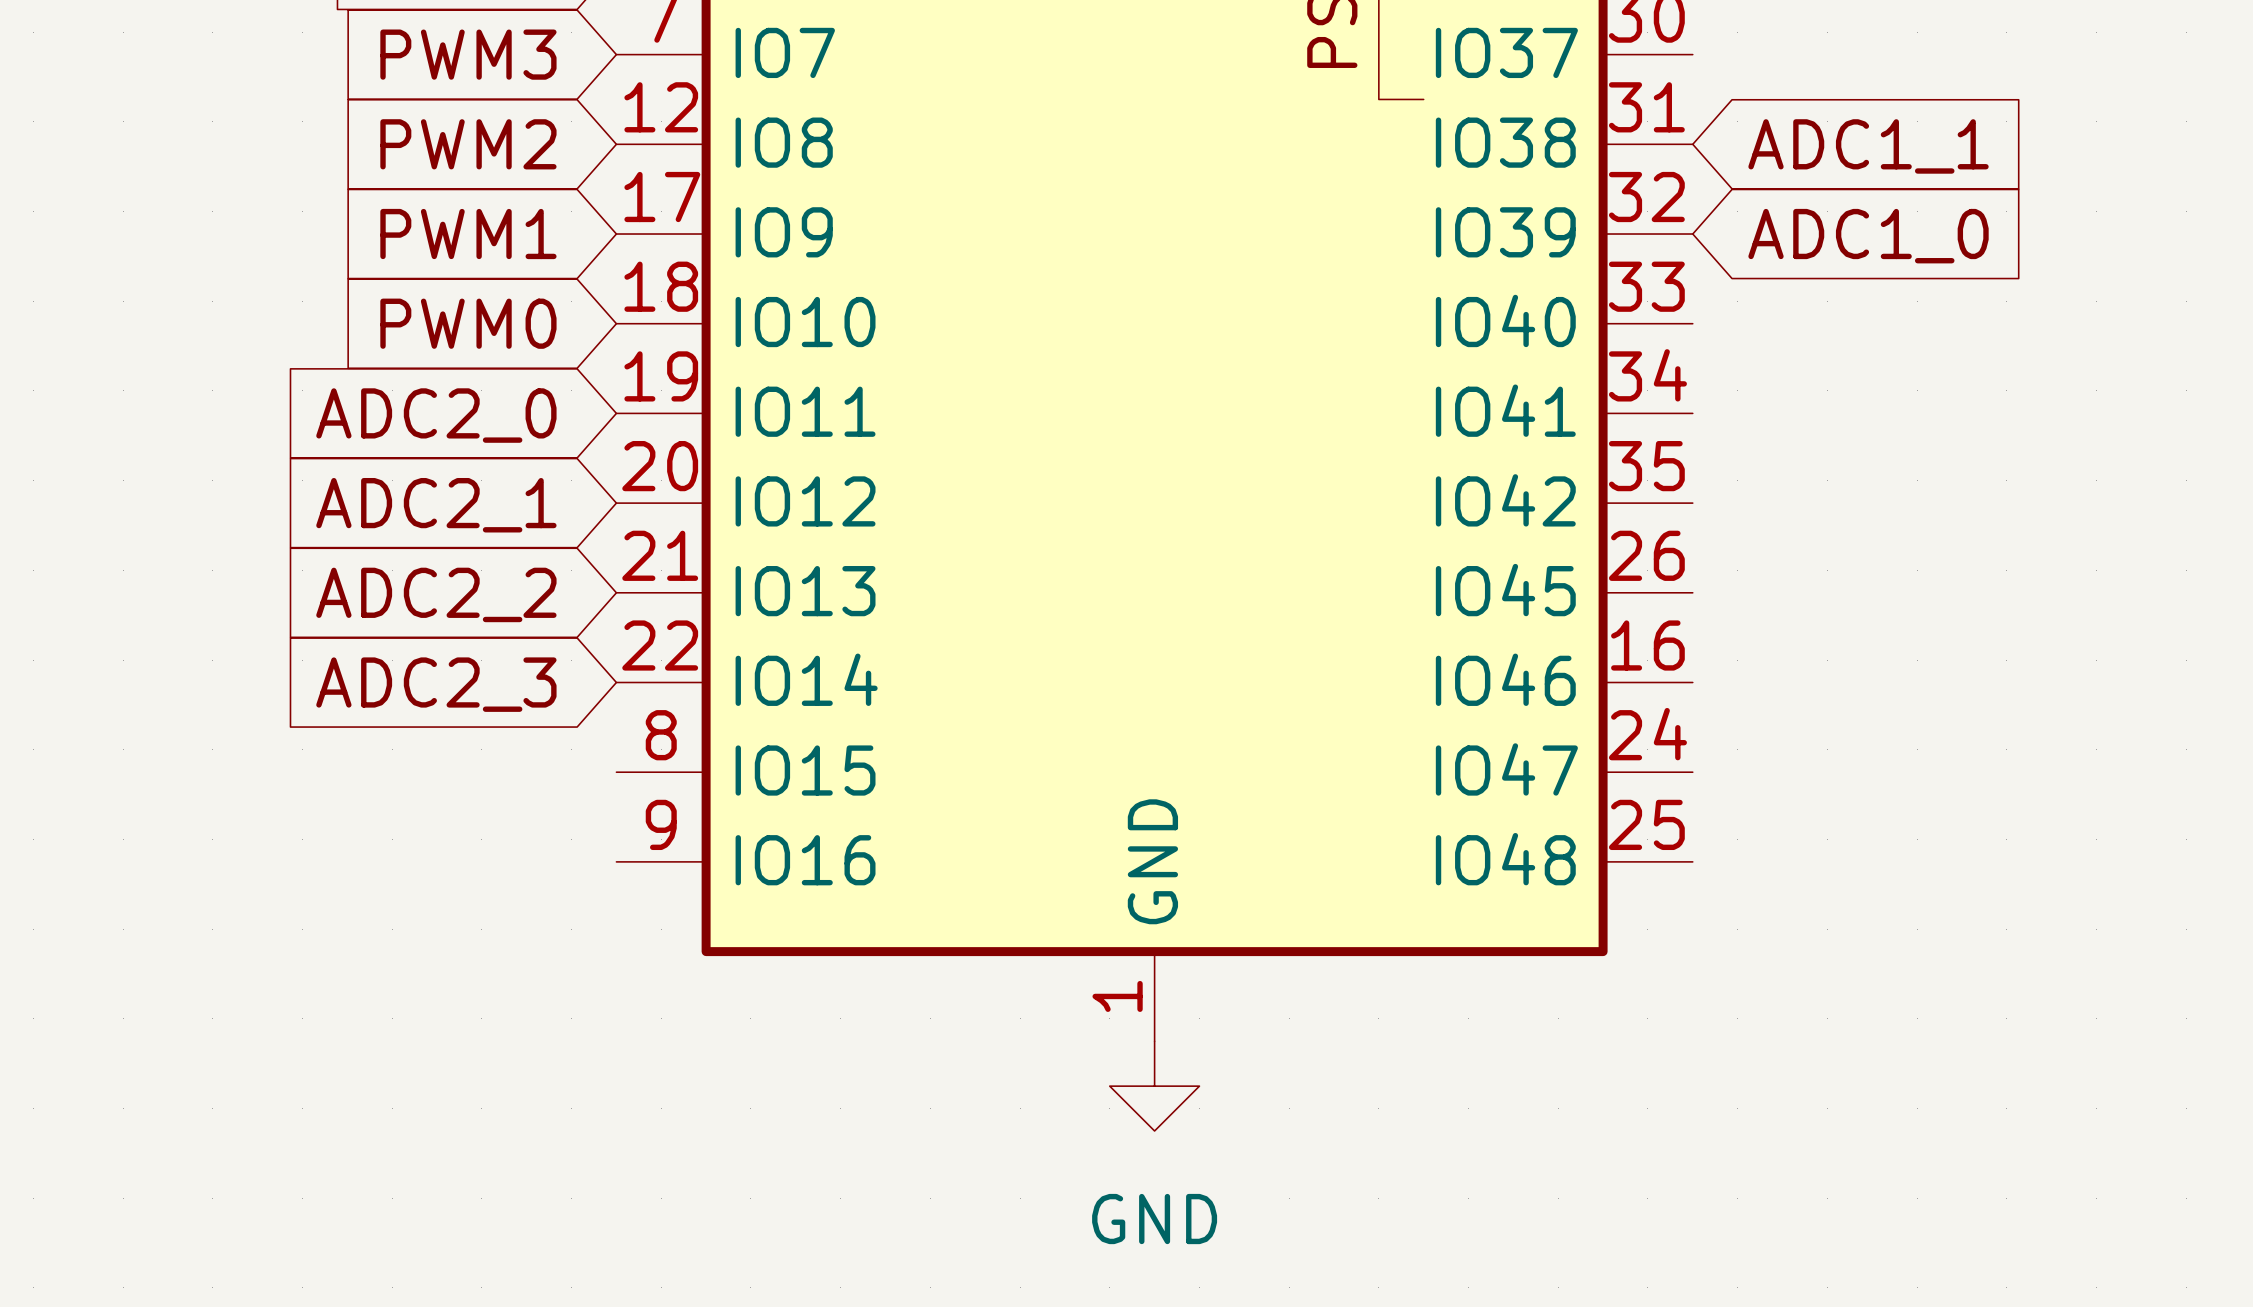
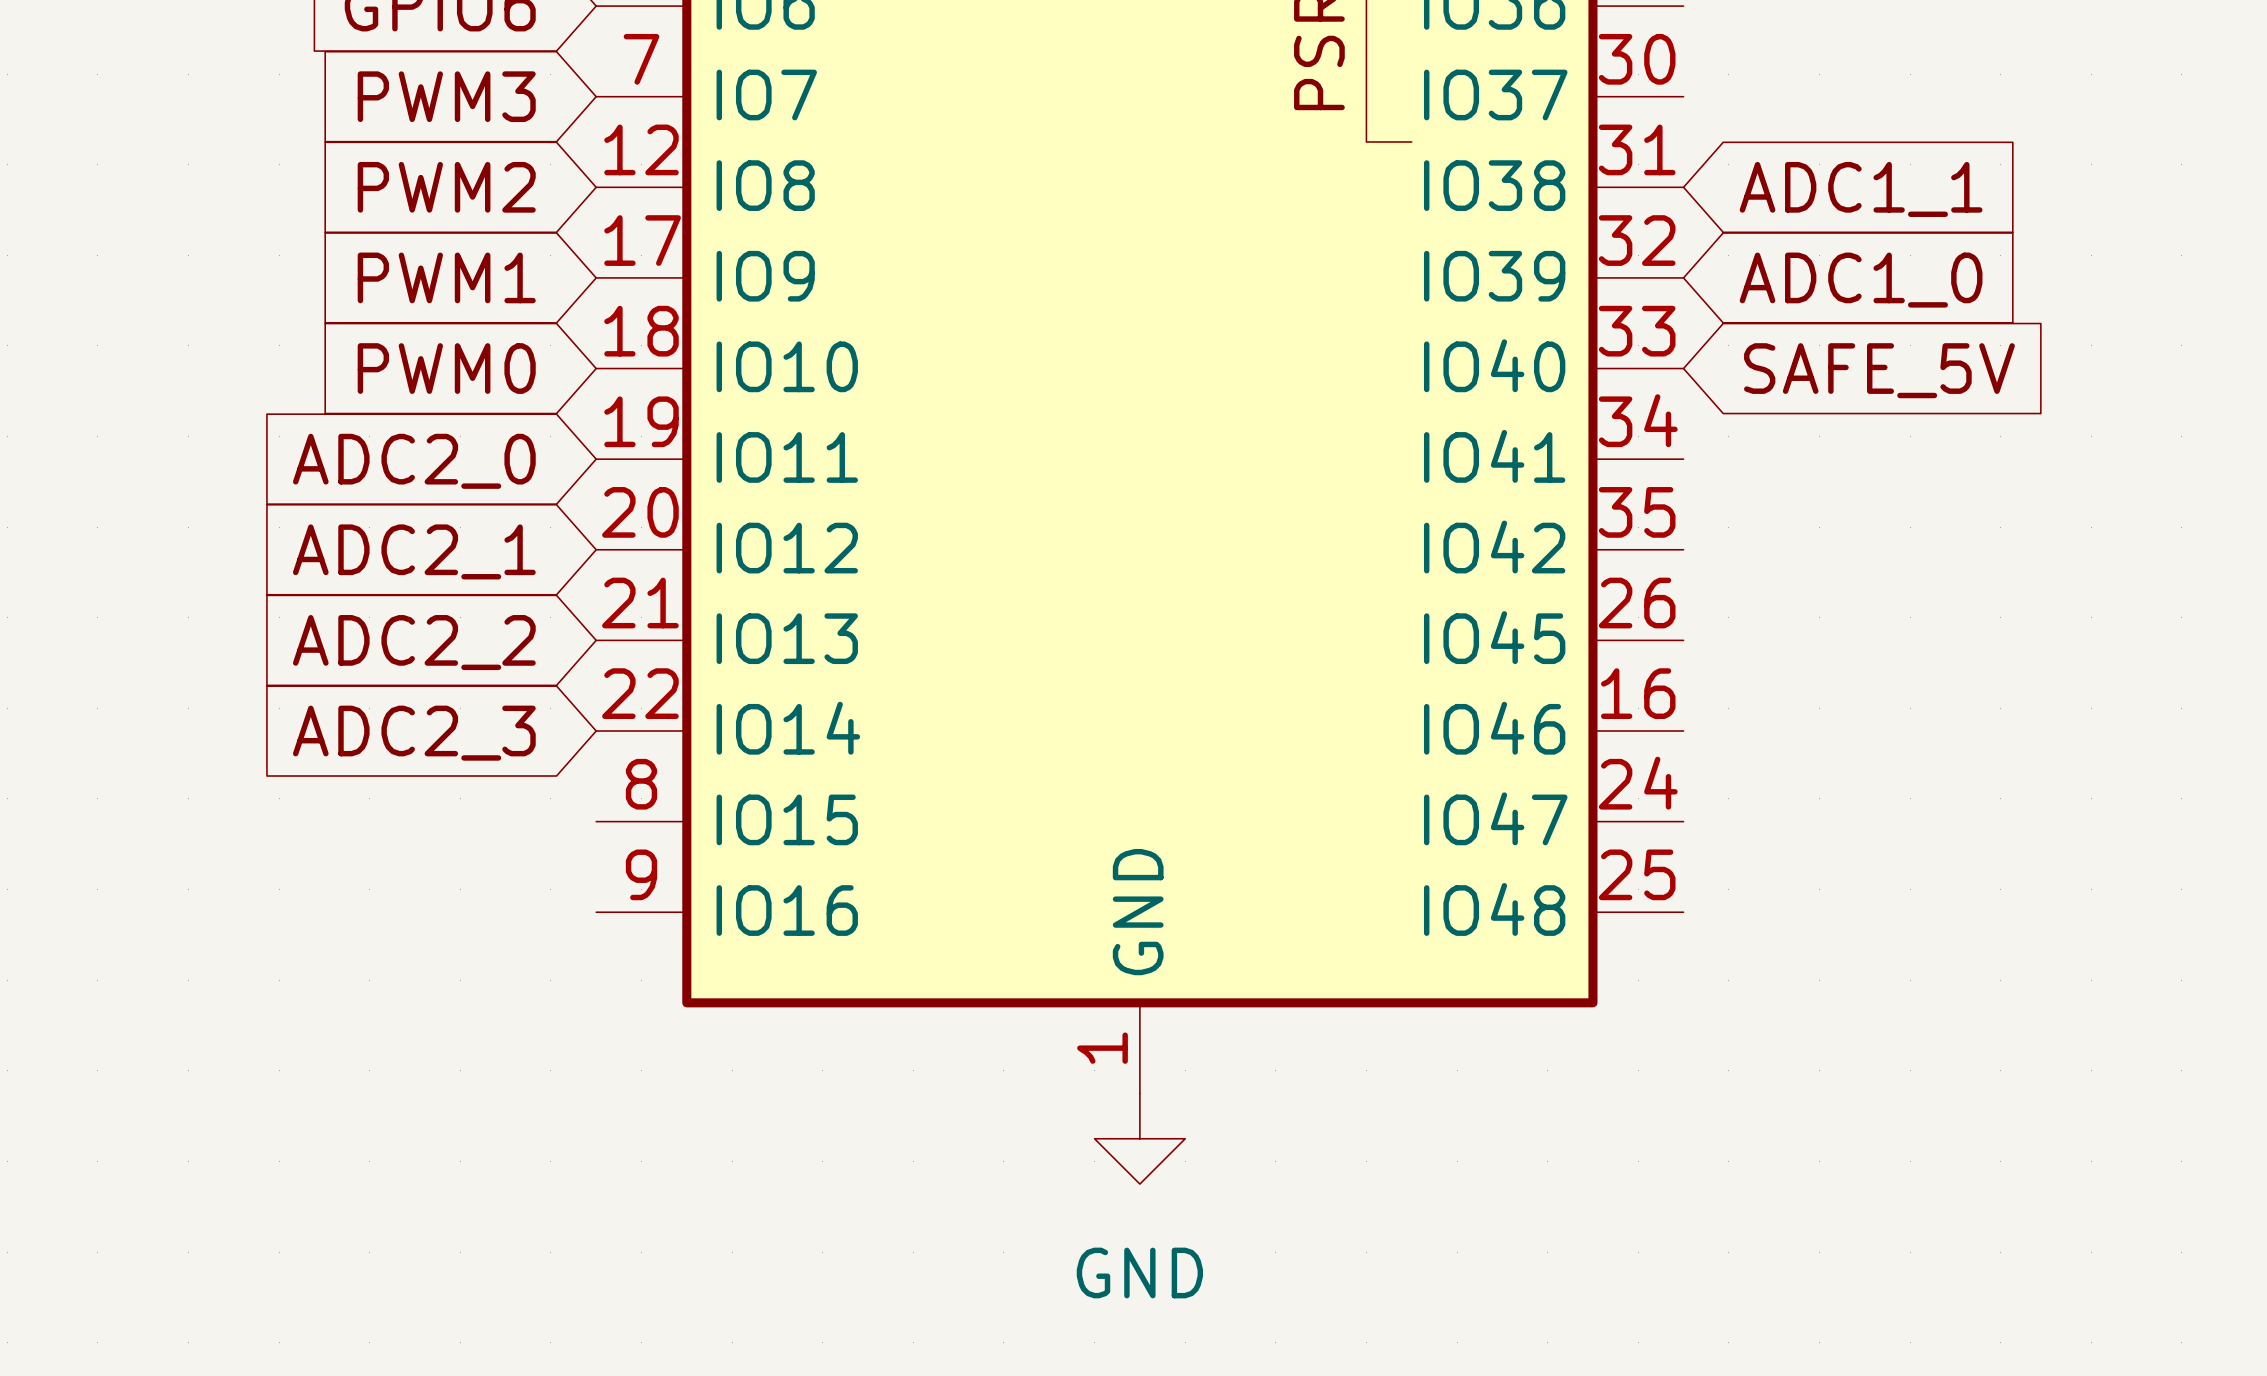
global label: none -> SAFE_5V (1879, 370)

